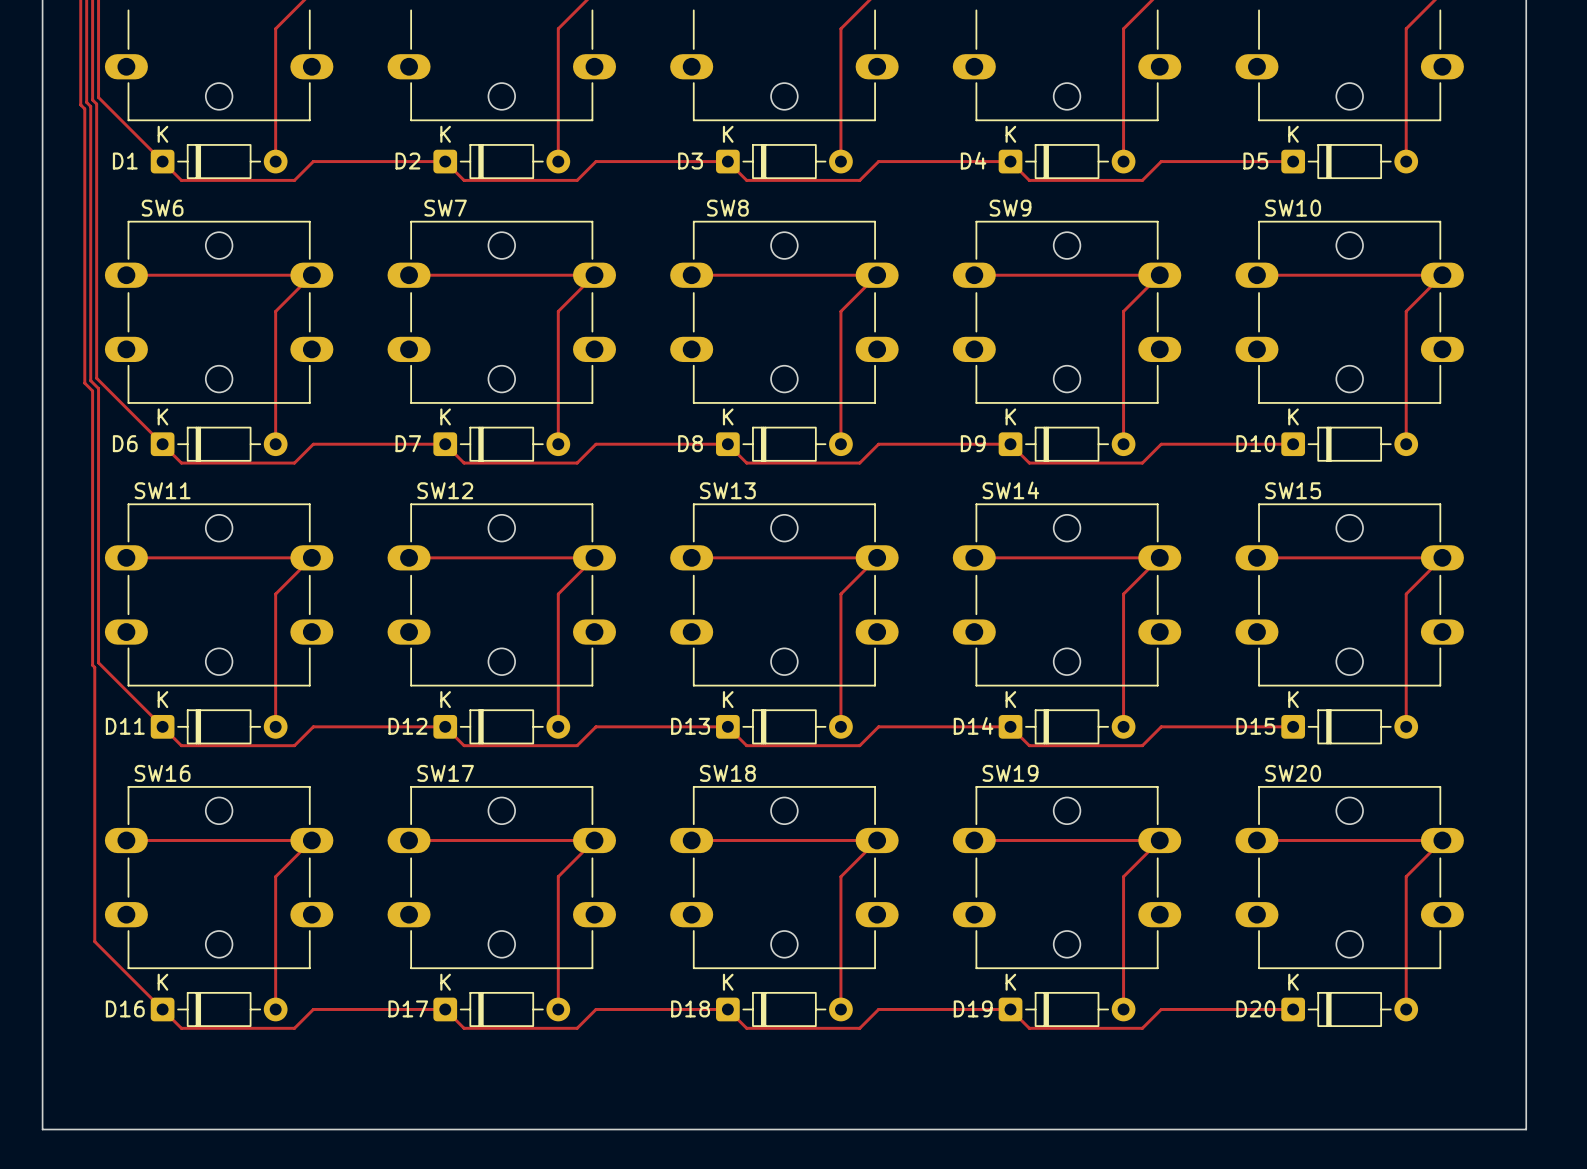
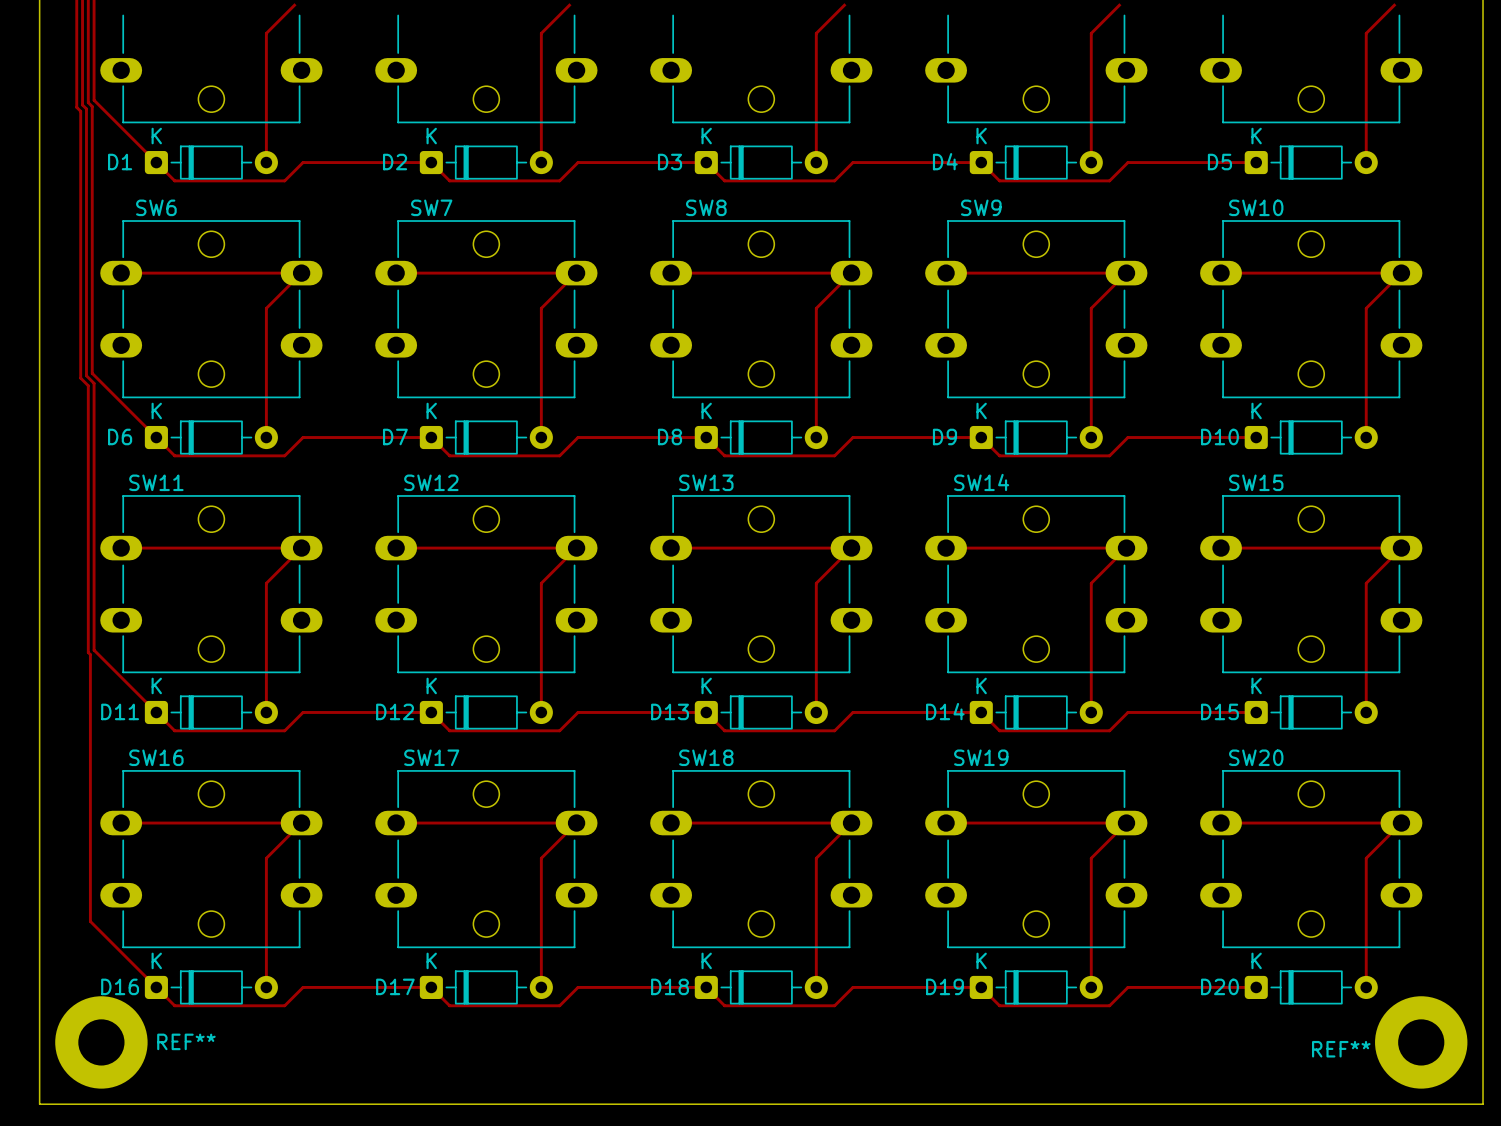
REF**: none -> (101, 1042)
REF**: none -> (1421, 1042)

